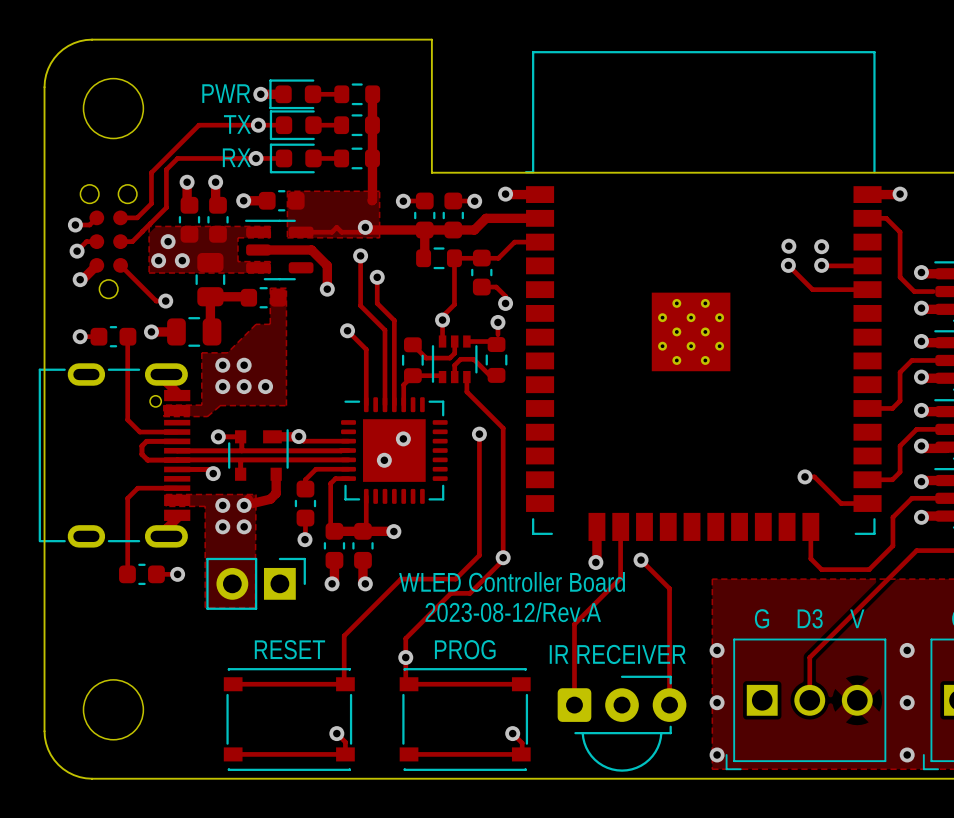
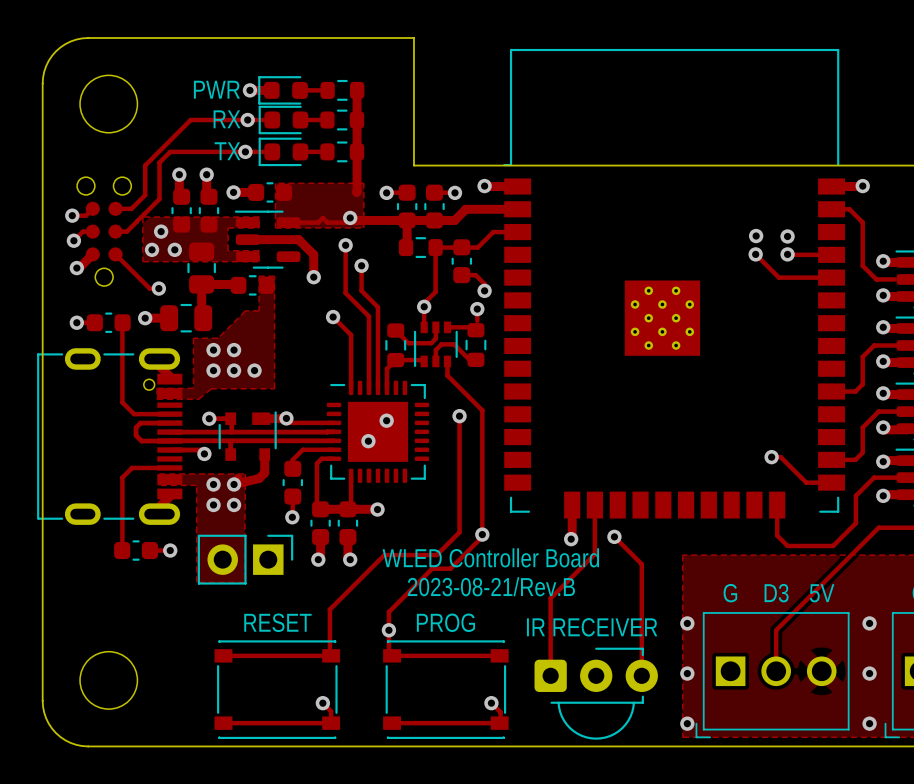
text: TX (237, 124) -> RX (227, 119)
text: RX (236, 157) -> TX (227, 151)
text: 2023-08-12/Rev.A (513, 612) -> 2023-08-21/Rev.B (491, 586)
text: V (857, 618) -> 5V (822, 593)

